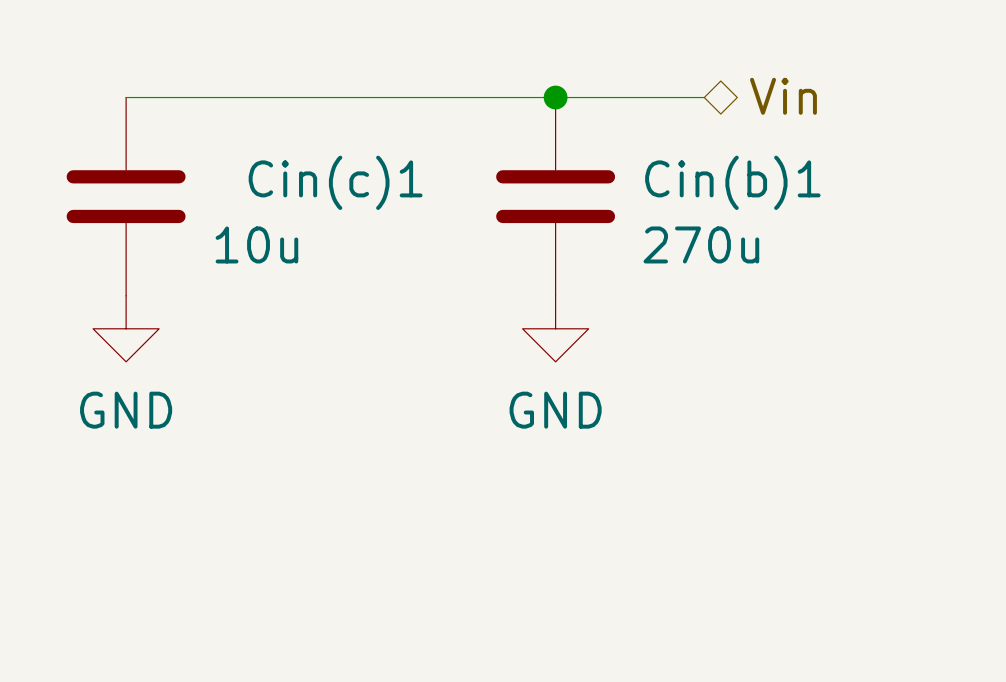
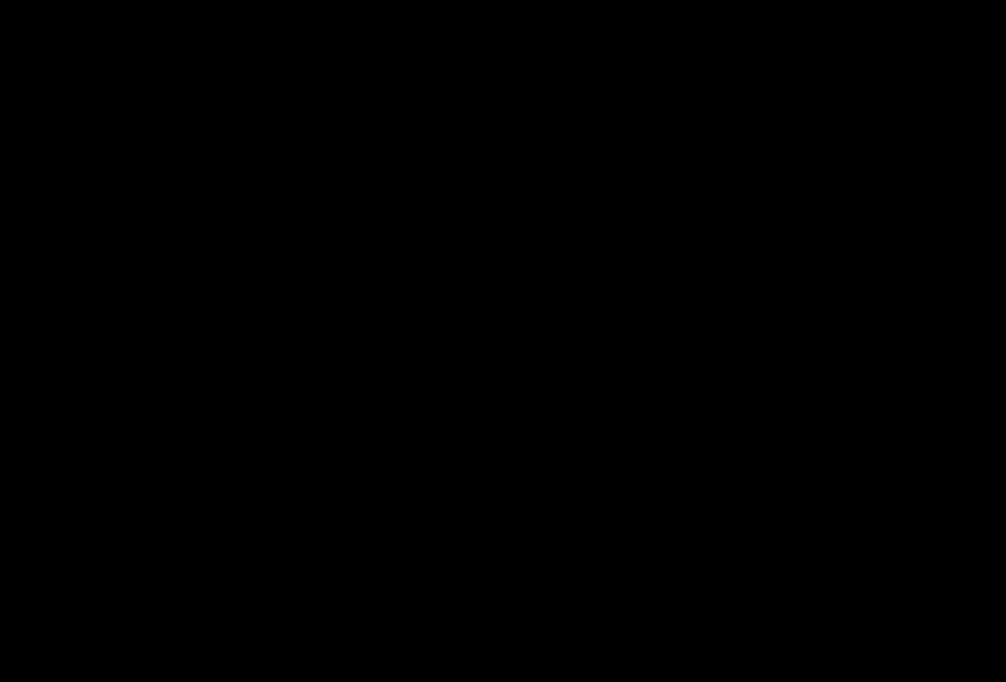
hierarchical label: Vin (783, 96) -> none
wire: (126, 97) (704, 97) -> none
junction: (555, 97) -> none
Cin(c)1: 10u (126, 196) -> none
Cin(b)1: 270u (555, 196) -> none
power symbol: GND (126, 328) -> none
power symbol: GND (555, 328) -> none

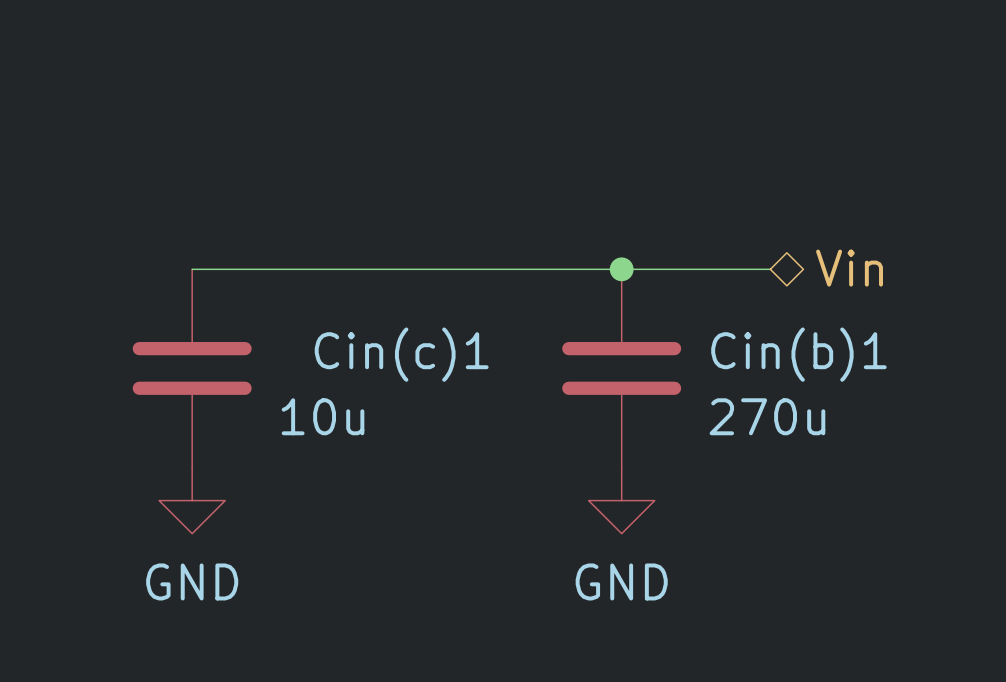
hierarchical label: none -> Vin (849, 268)
wire: none -> (192, 269) (770, 269)
junction: none -> (621, 269)
Cin(c)1: none -> 10u (192, 368)
Cin(b)1: none -> 270u (621, 368)
power symbol: none -> GND (192, 500)
power symbol: none -> GND (621, 500)

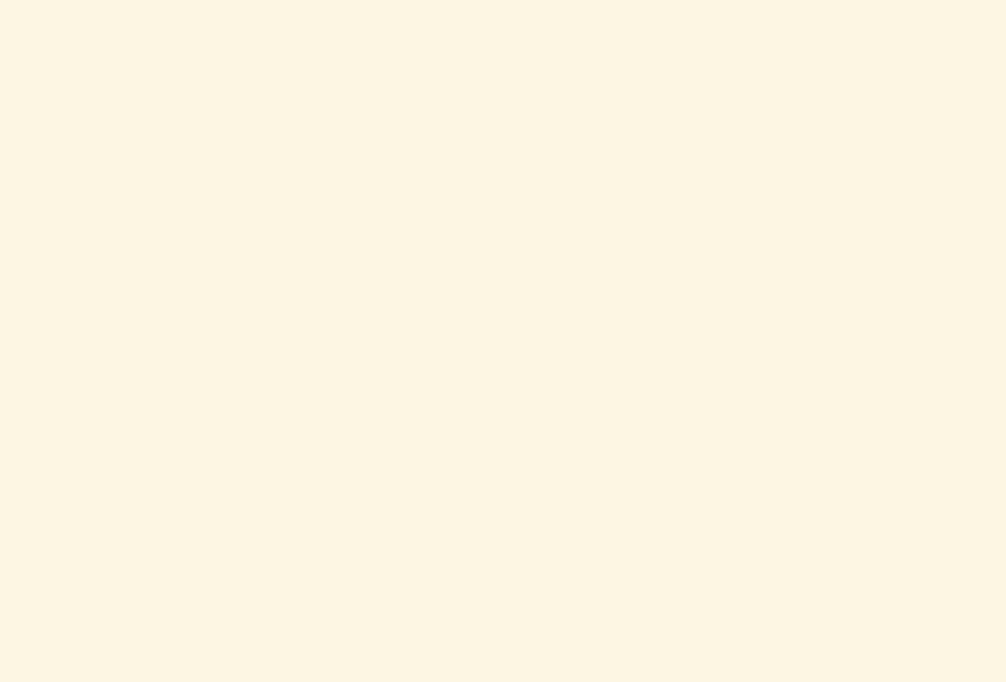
hierarchical label: Vin (849, 268) -> none
wire: (192, 269) (770, 269) -> none
junction: (621, 269) -> none
Cin(c)1: 10u (192, 368) -> none
Cin(b)1: 270u (621, 368) -> none
power symbol: GND (192, 500) -> none
power symbol: GND (621, 500) -> none

